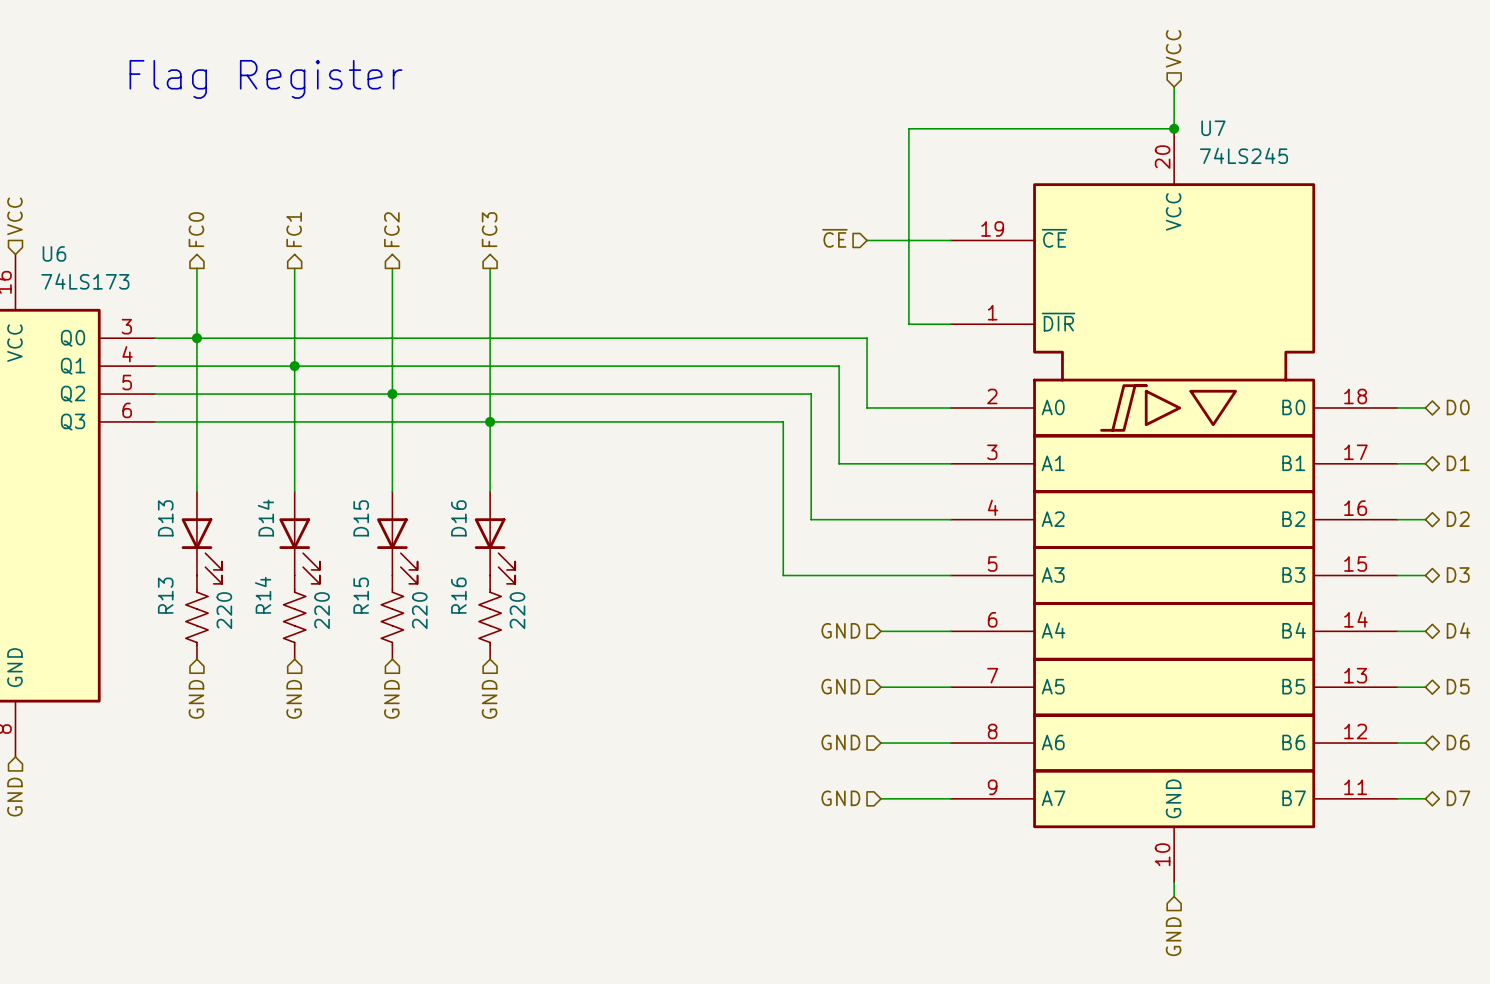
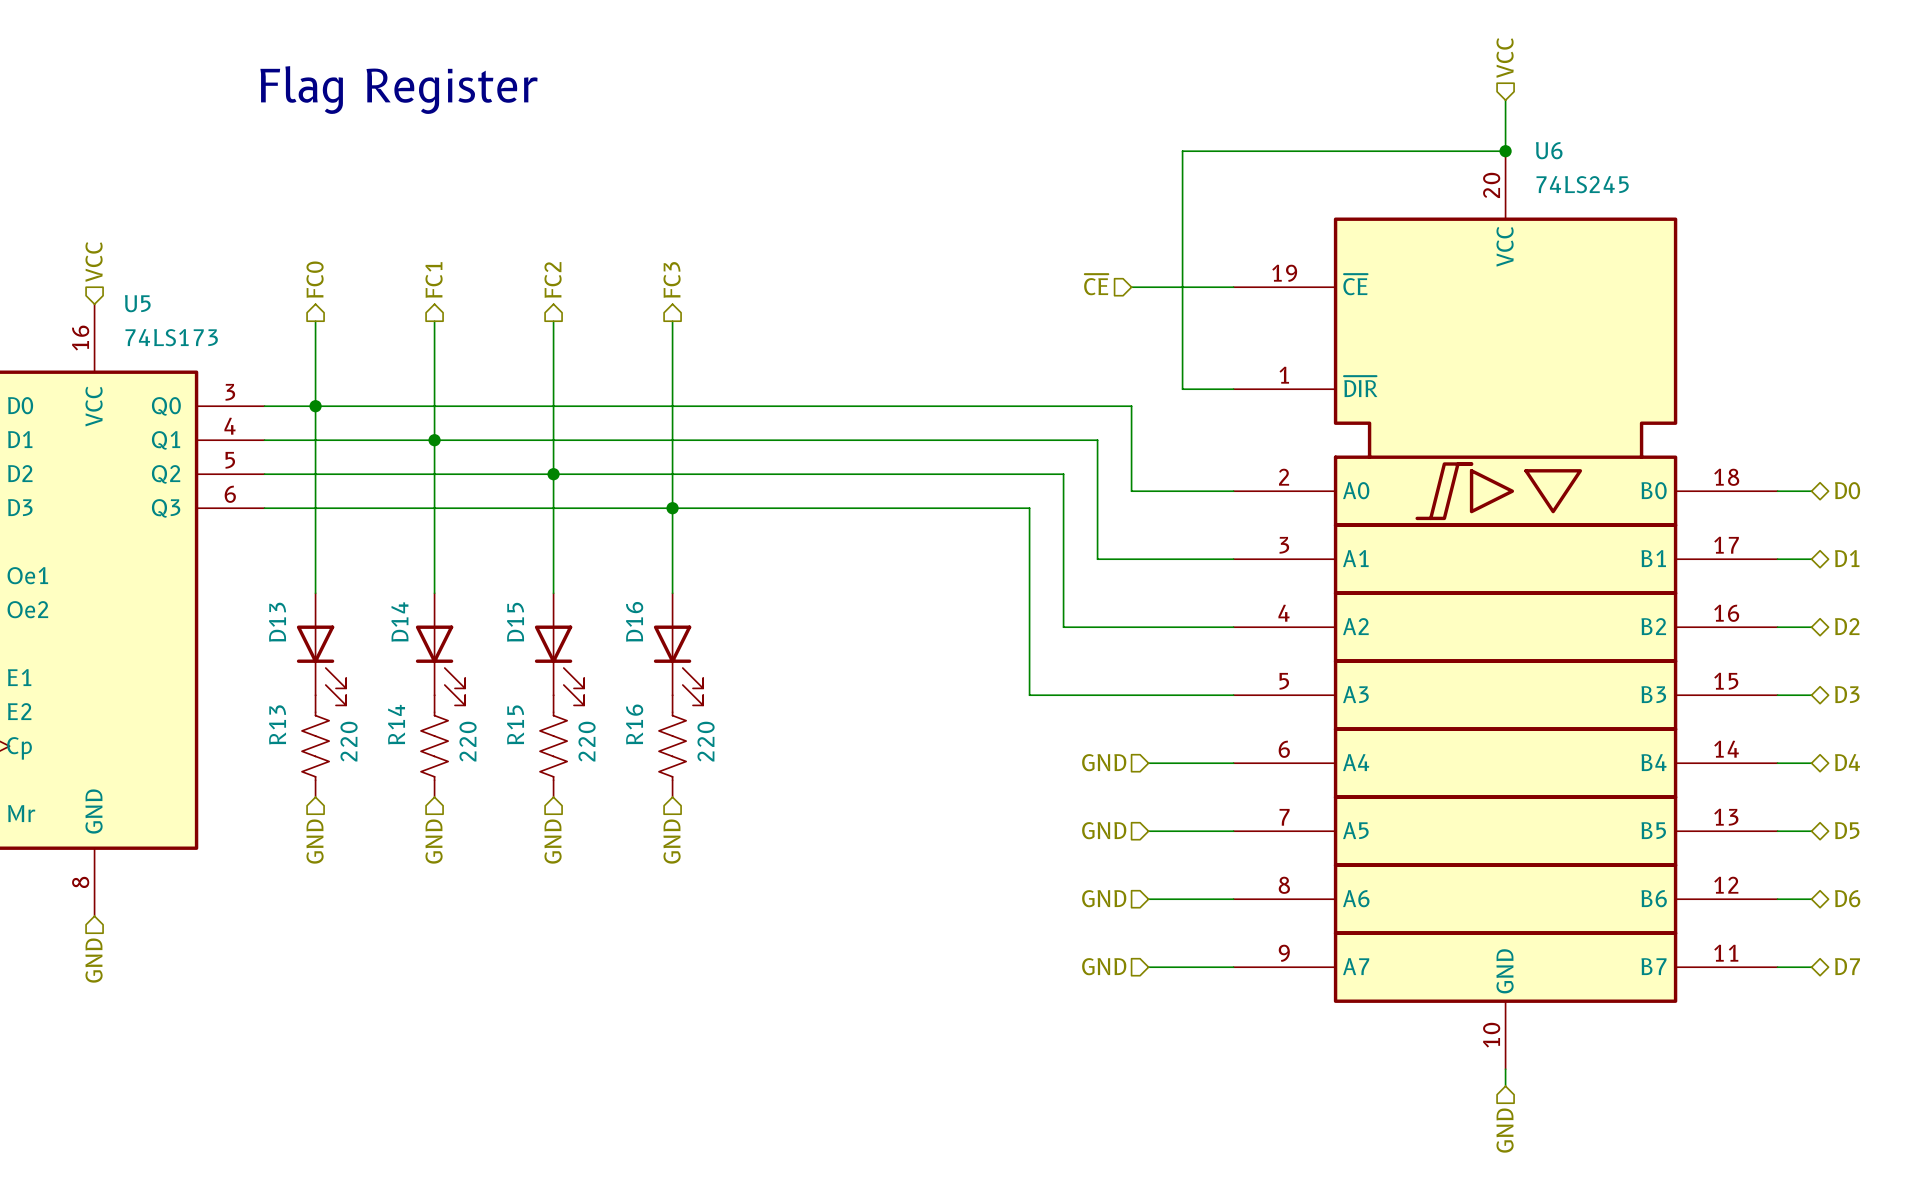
U7 name: U7 (1213, 128) -> U6 (1549, 150)
U6 name: U6 (54, 253) -> U5 (137, 303)

